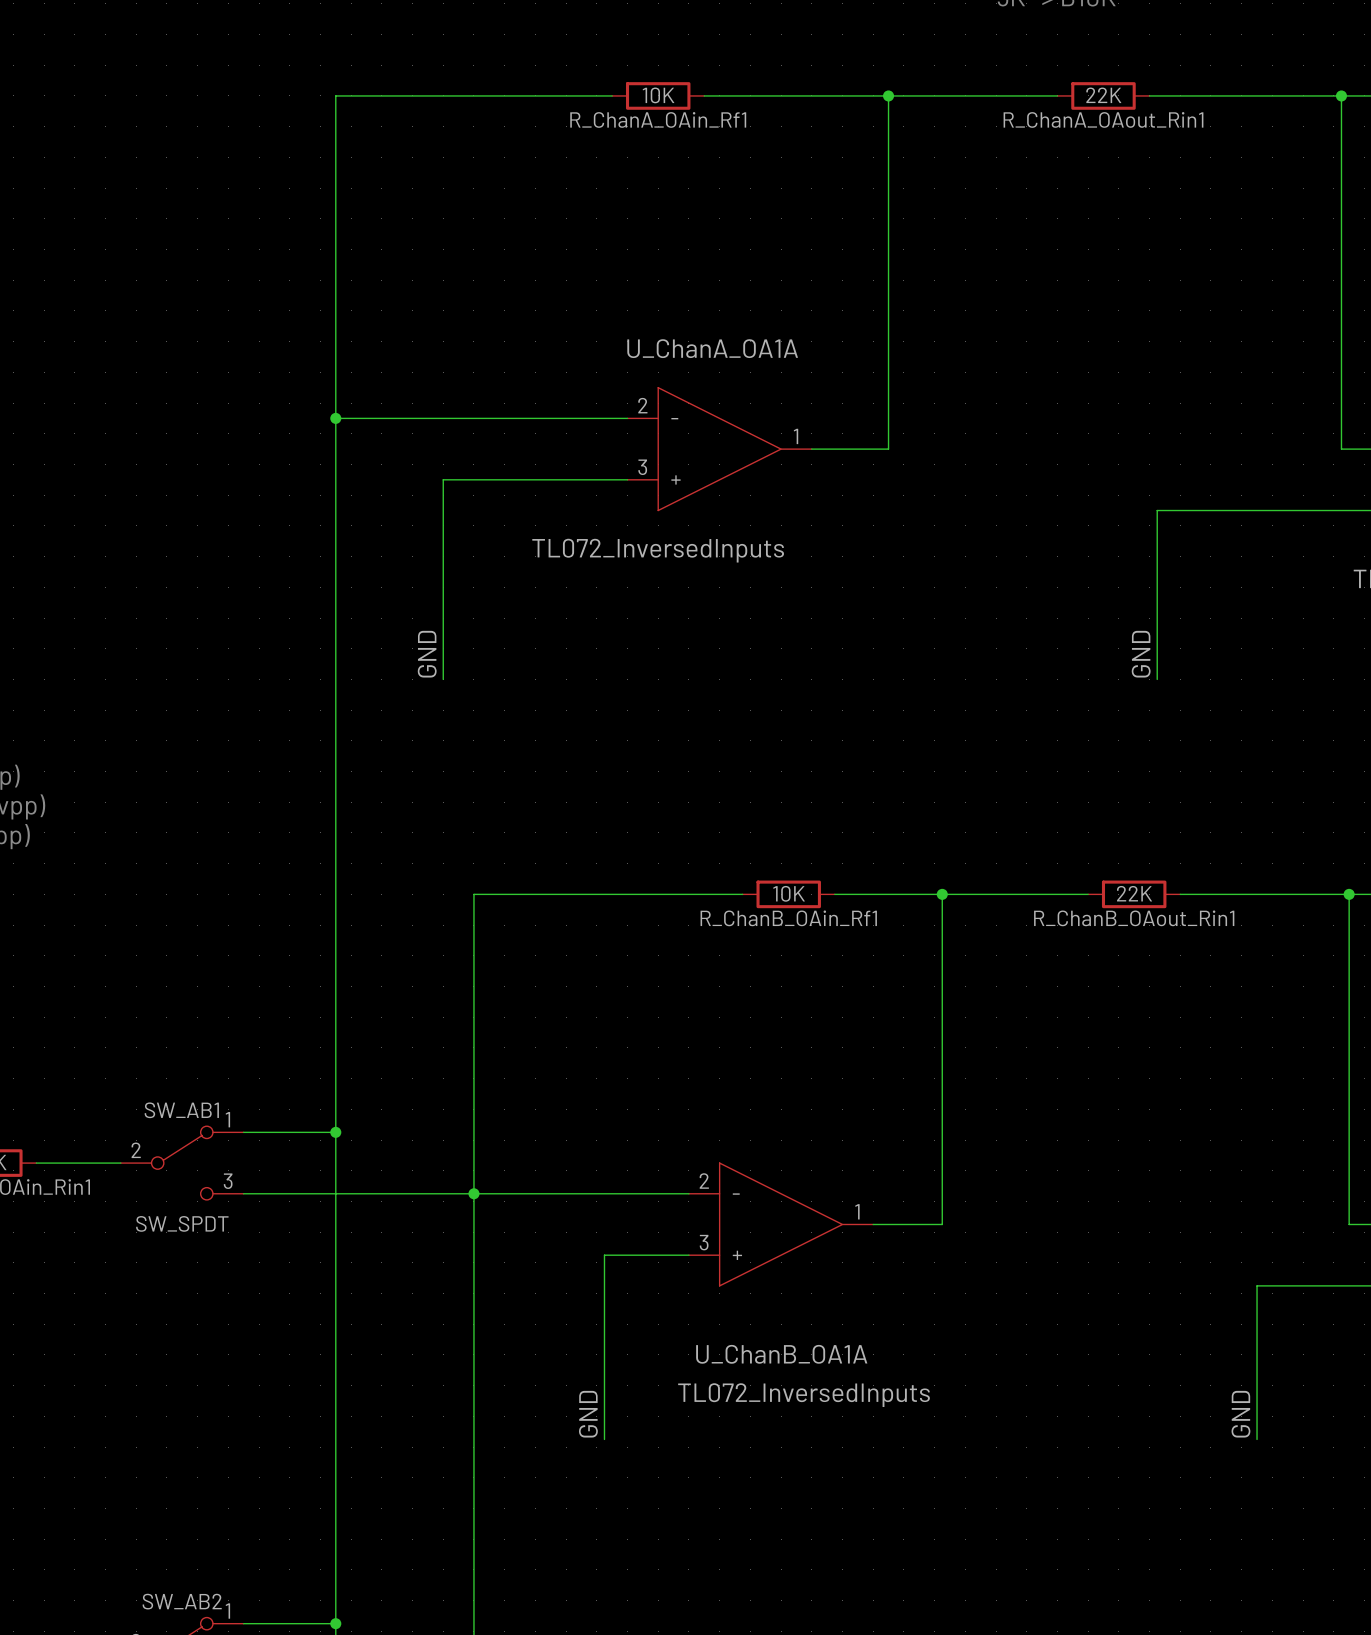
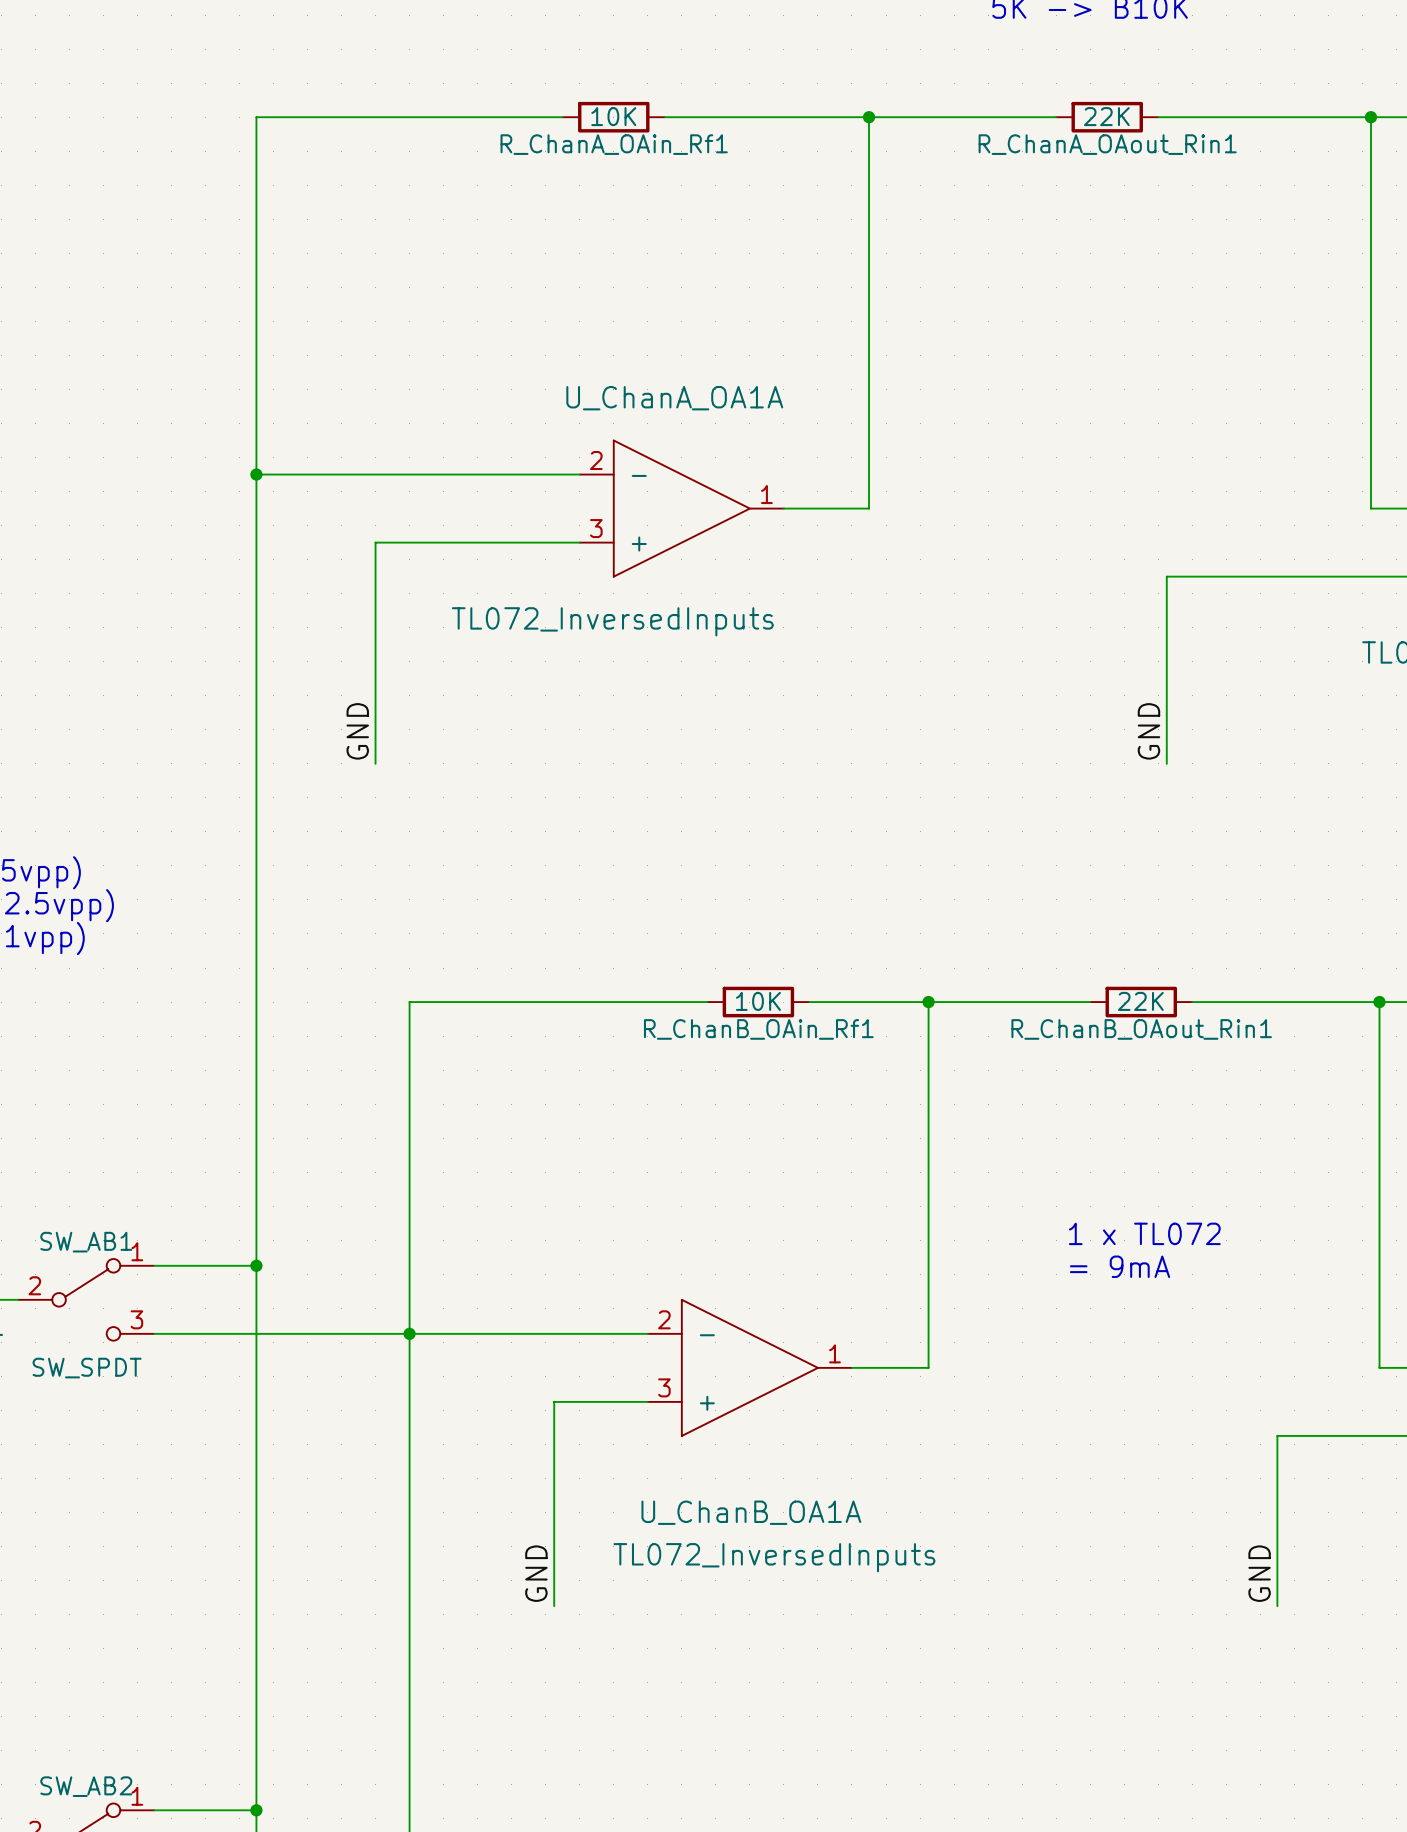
text: none -> 1 x TL072 (1144, 1233)
text: none -> = 9mA (1120, 1266)

